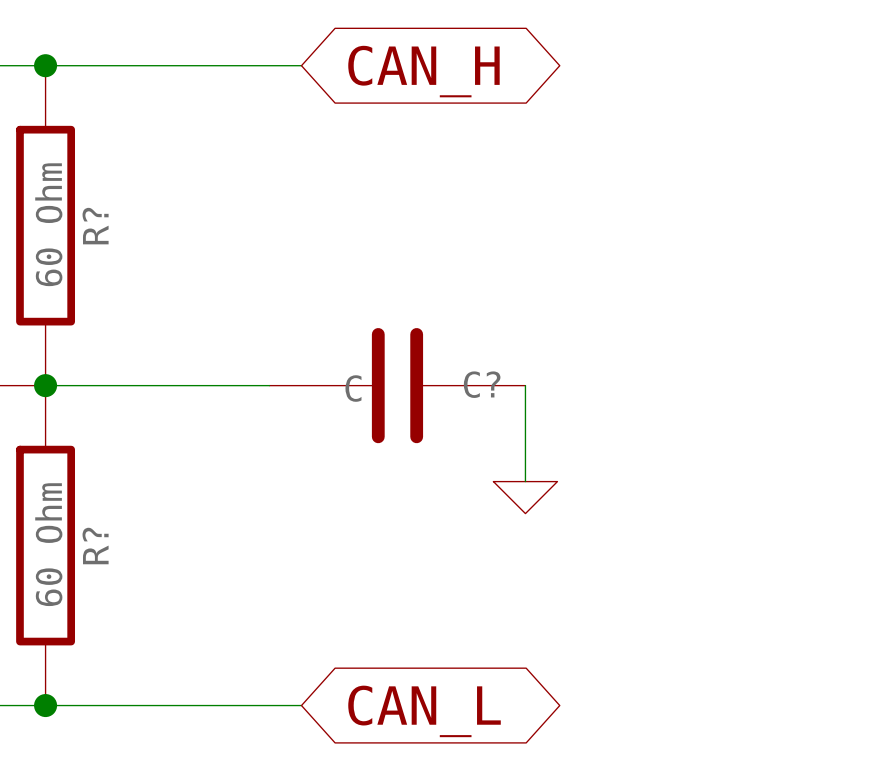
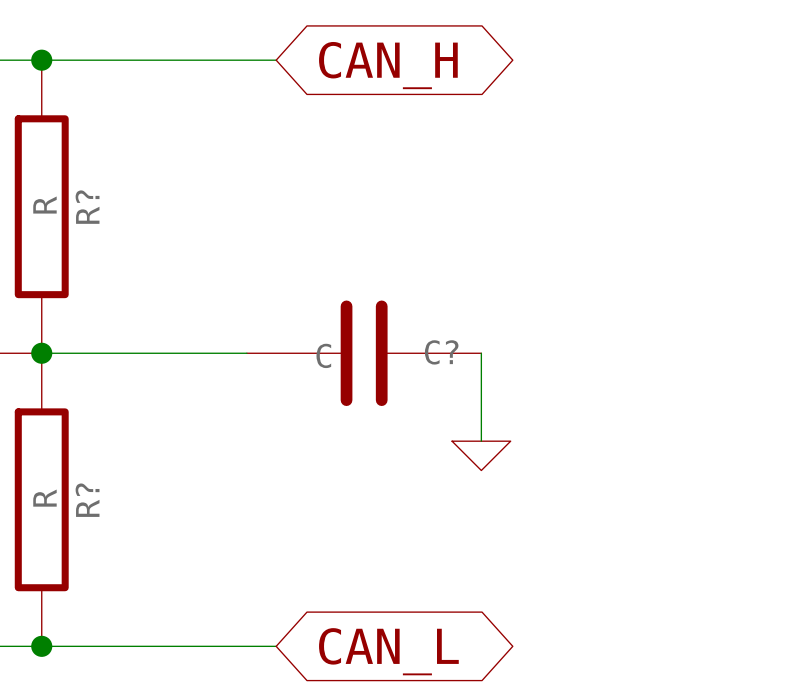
R? value: 60 Ohm (48, 224) -> R (44, 205)
R? value: 60 Ohm (48, 544) -> R (44, 498)

